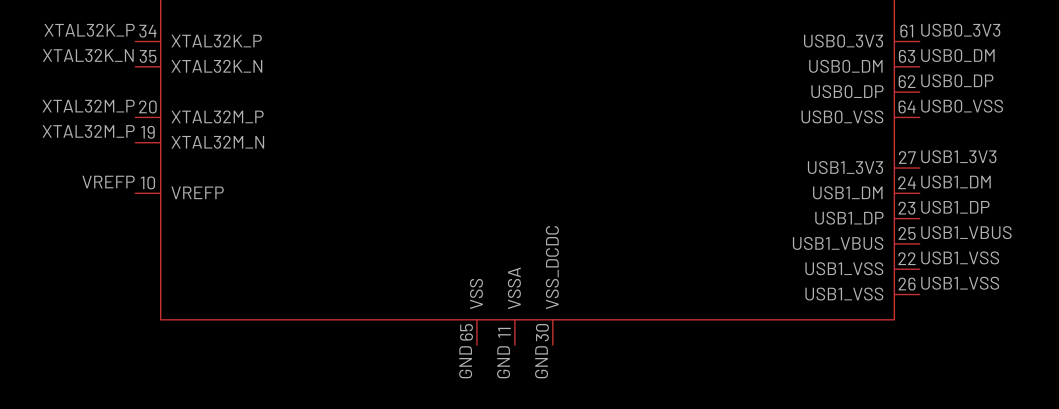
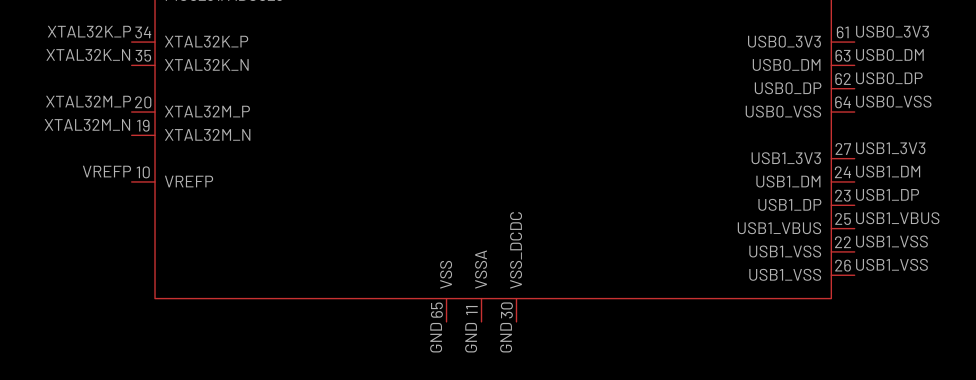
label: XTAL32M_P (88, 131) -> XTAL32M_N (87, 124)

